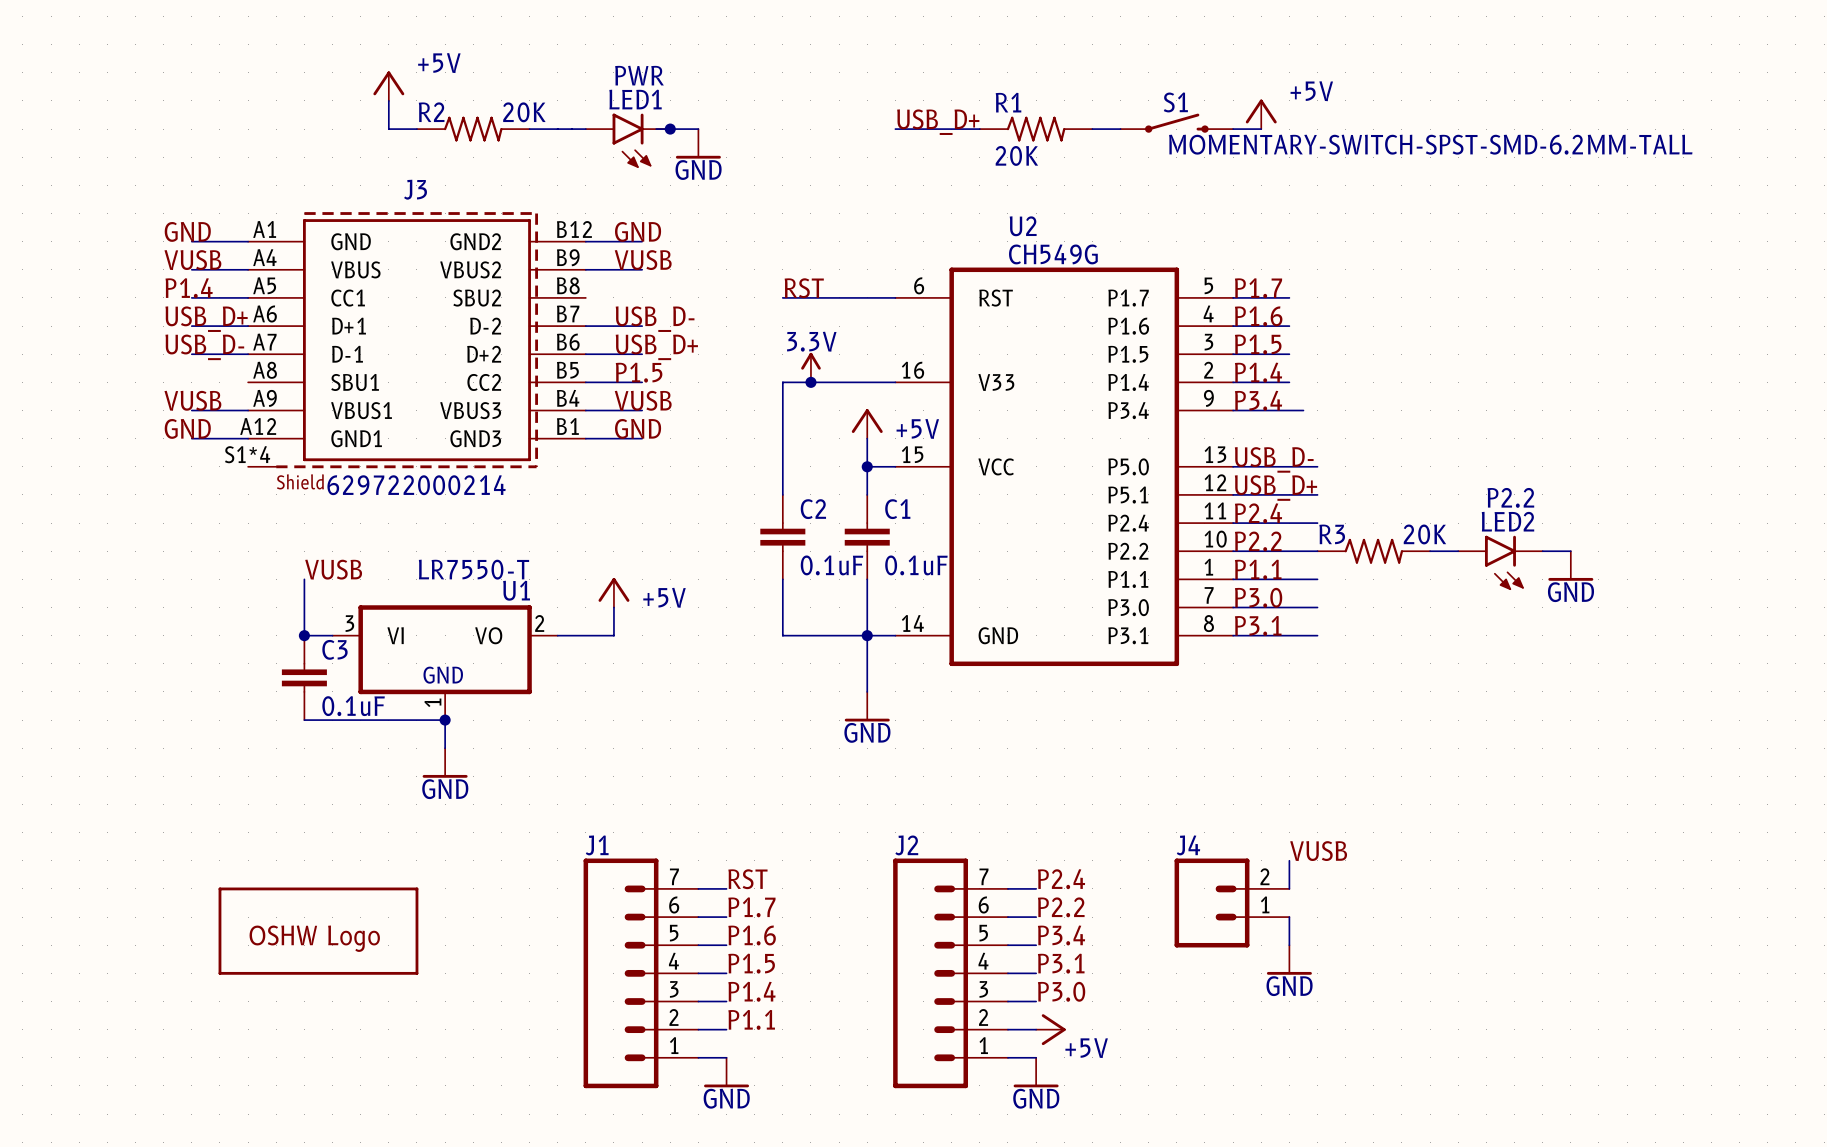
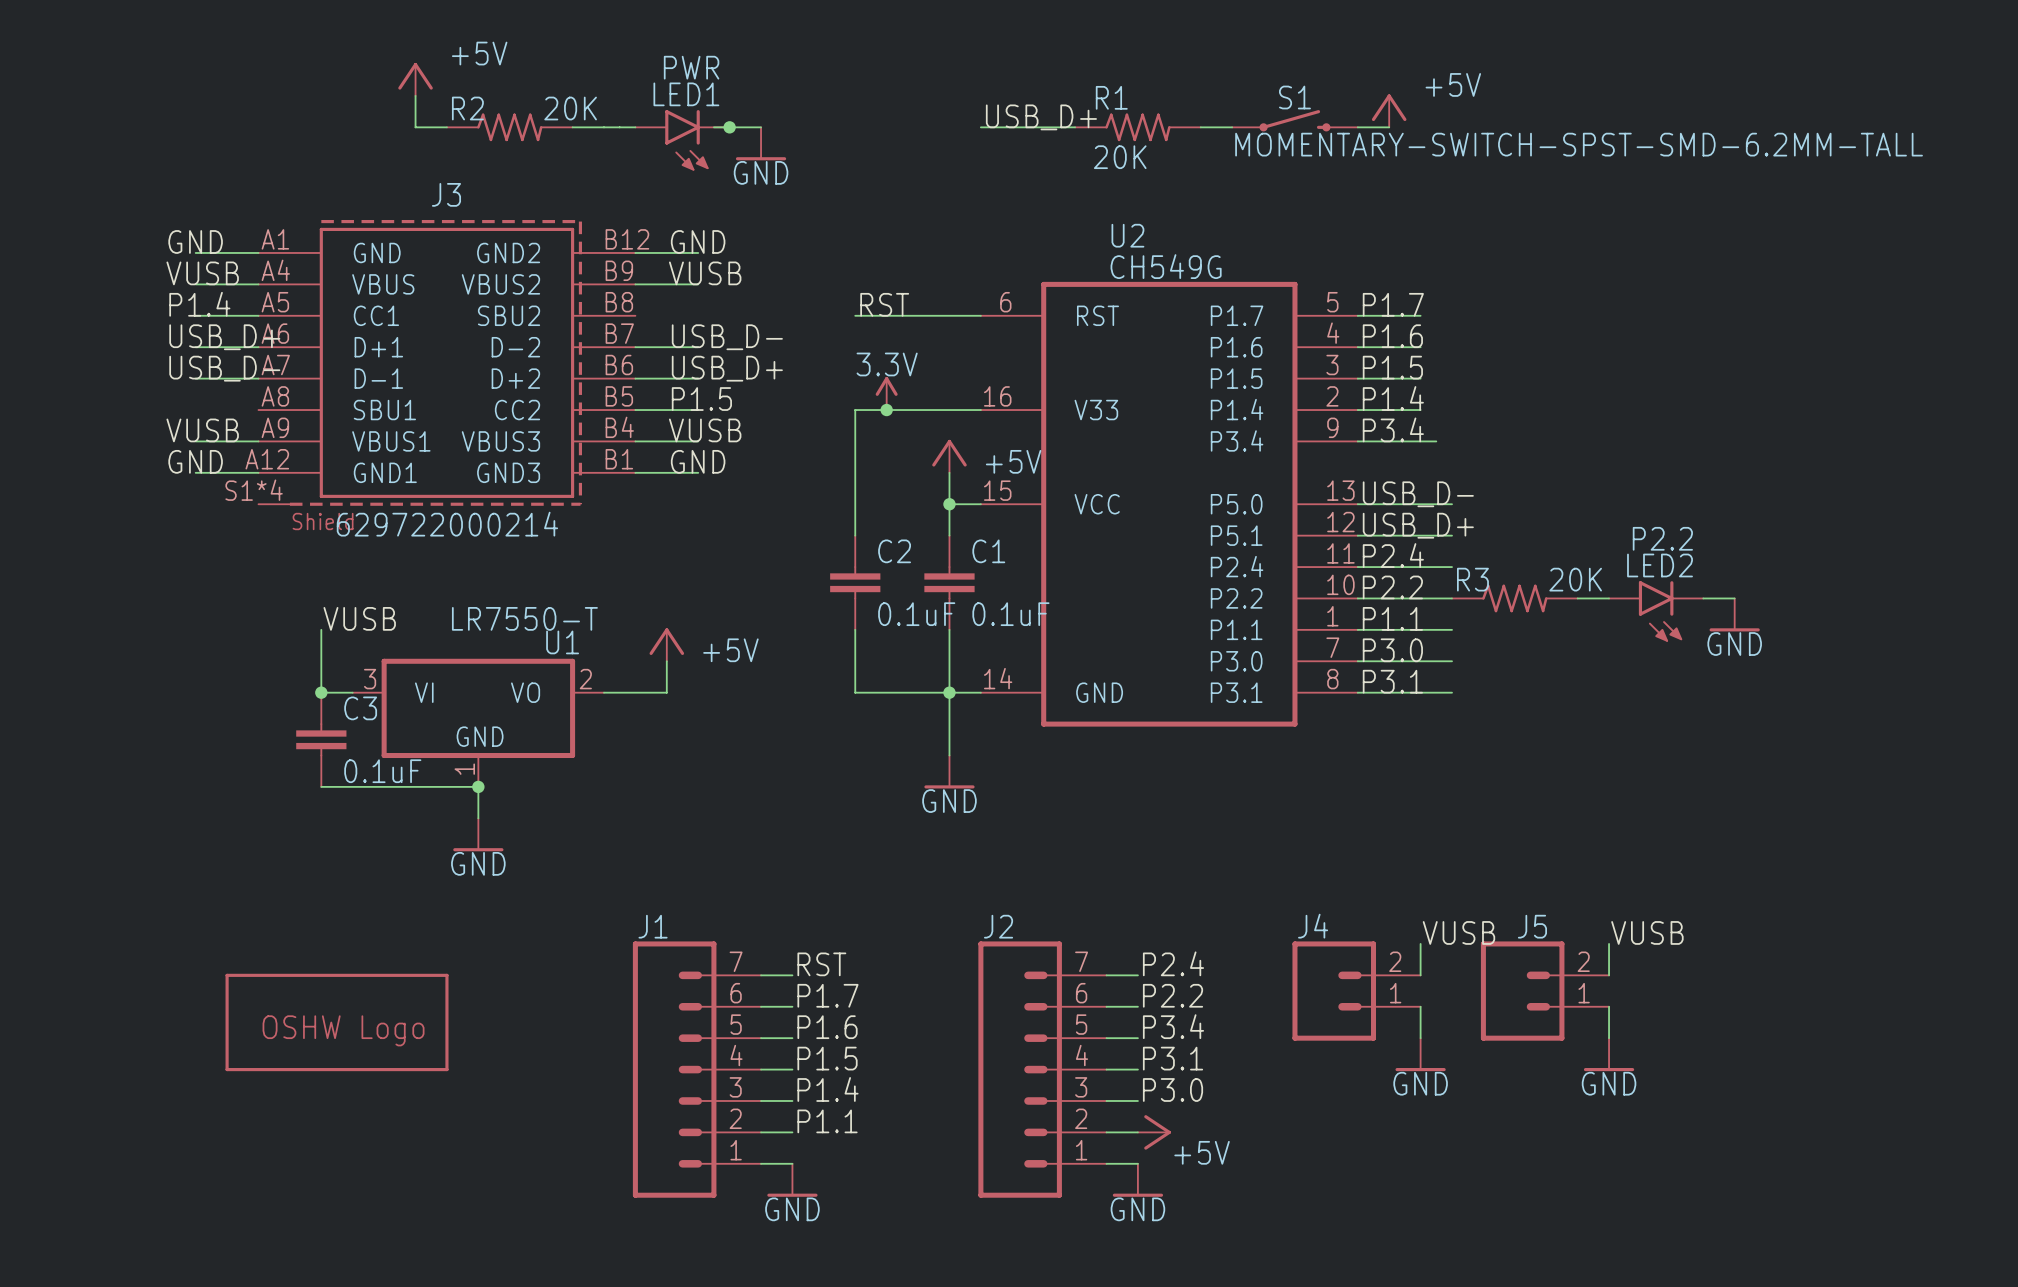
label: none -> VUSB (1647, 932)
wire: none -> (1609, 943) (1609, 975)
J5: none -> (1544, 991)
wire: none -> (1609, 1006) (1609, 1038)
power symbol: none -> GND (1609, 1054)

